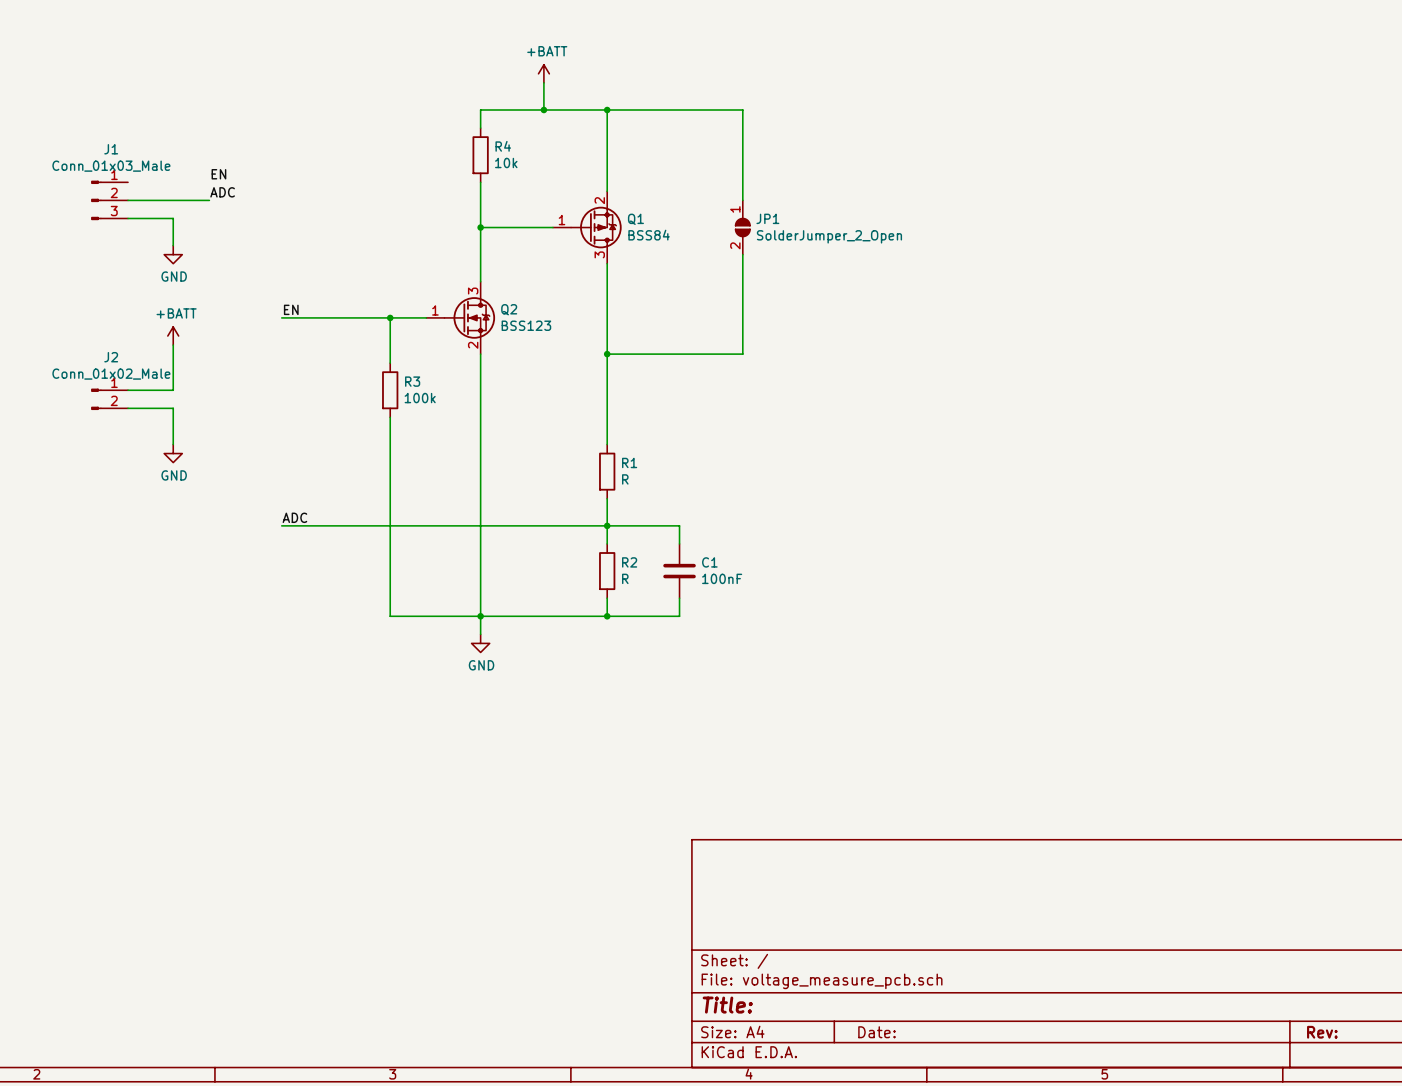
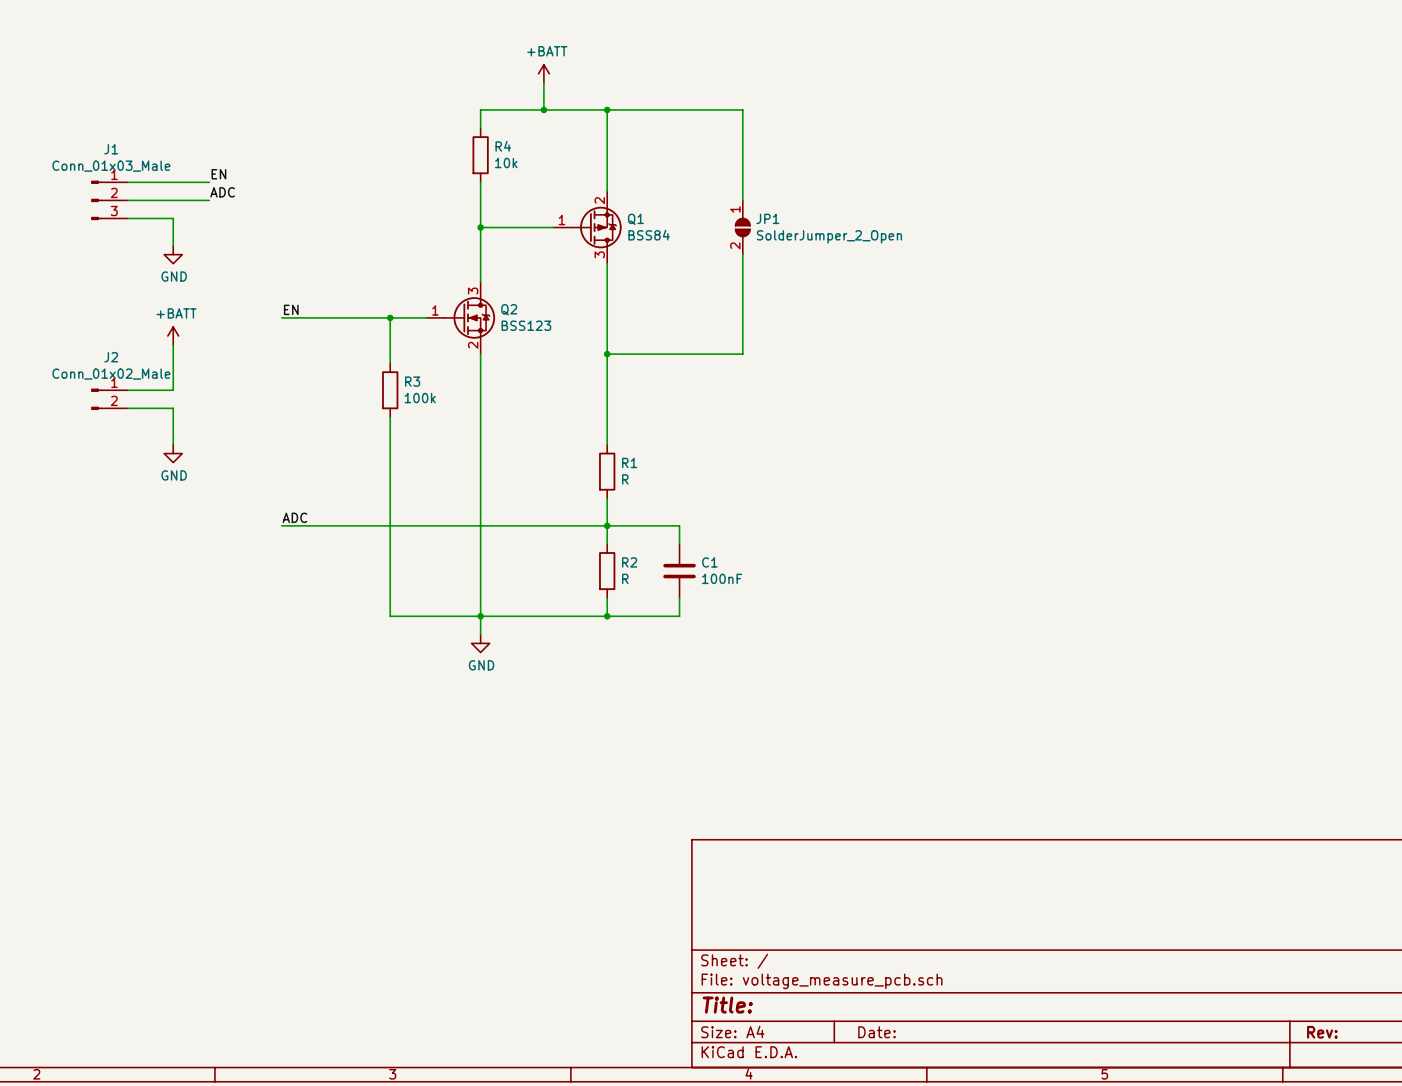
wire: none -> (128, 182) (209, 182)

